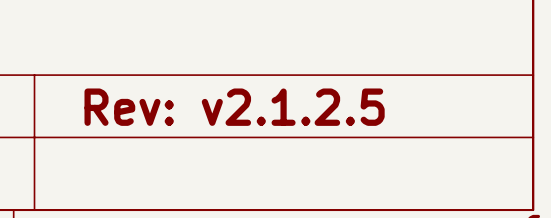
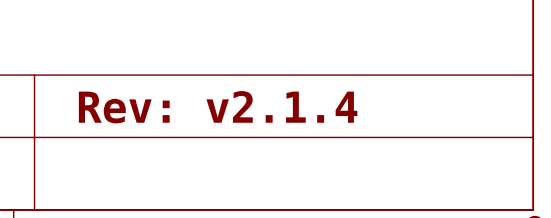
title block: Rev: v2.1.2.5 (234, 107) -> Rev: v2.1.4 (218, 107)

